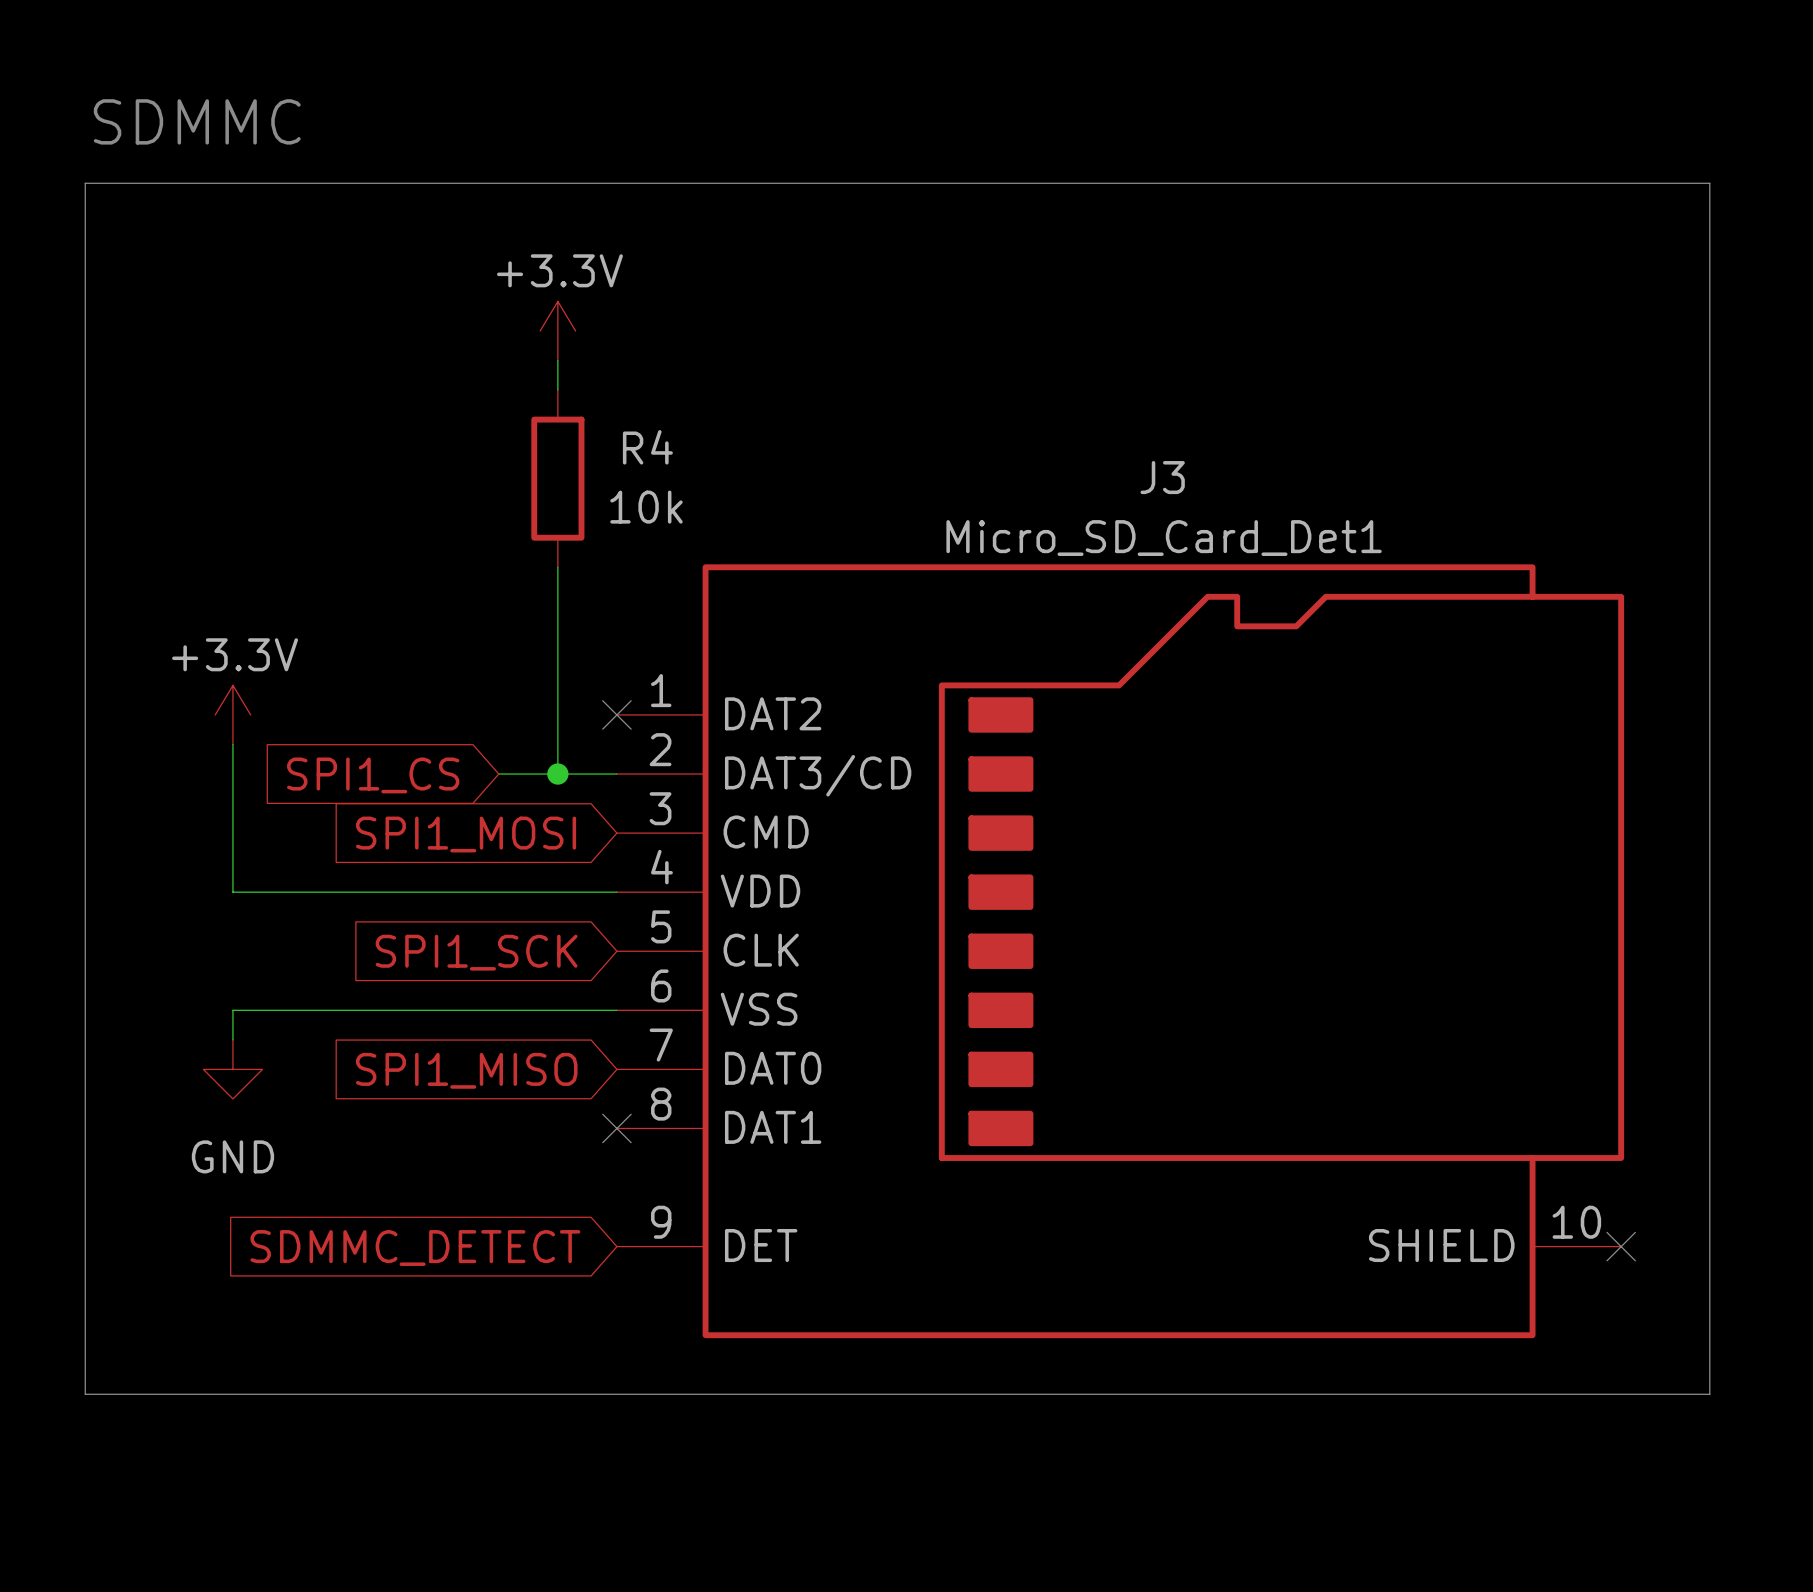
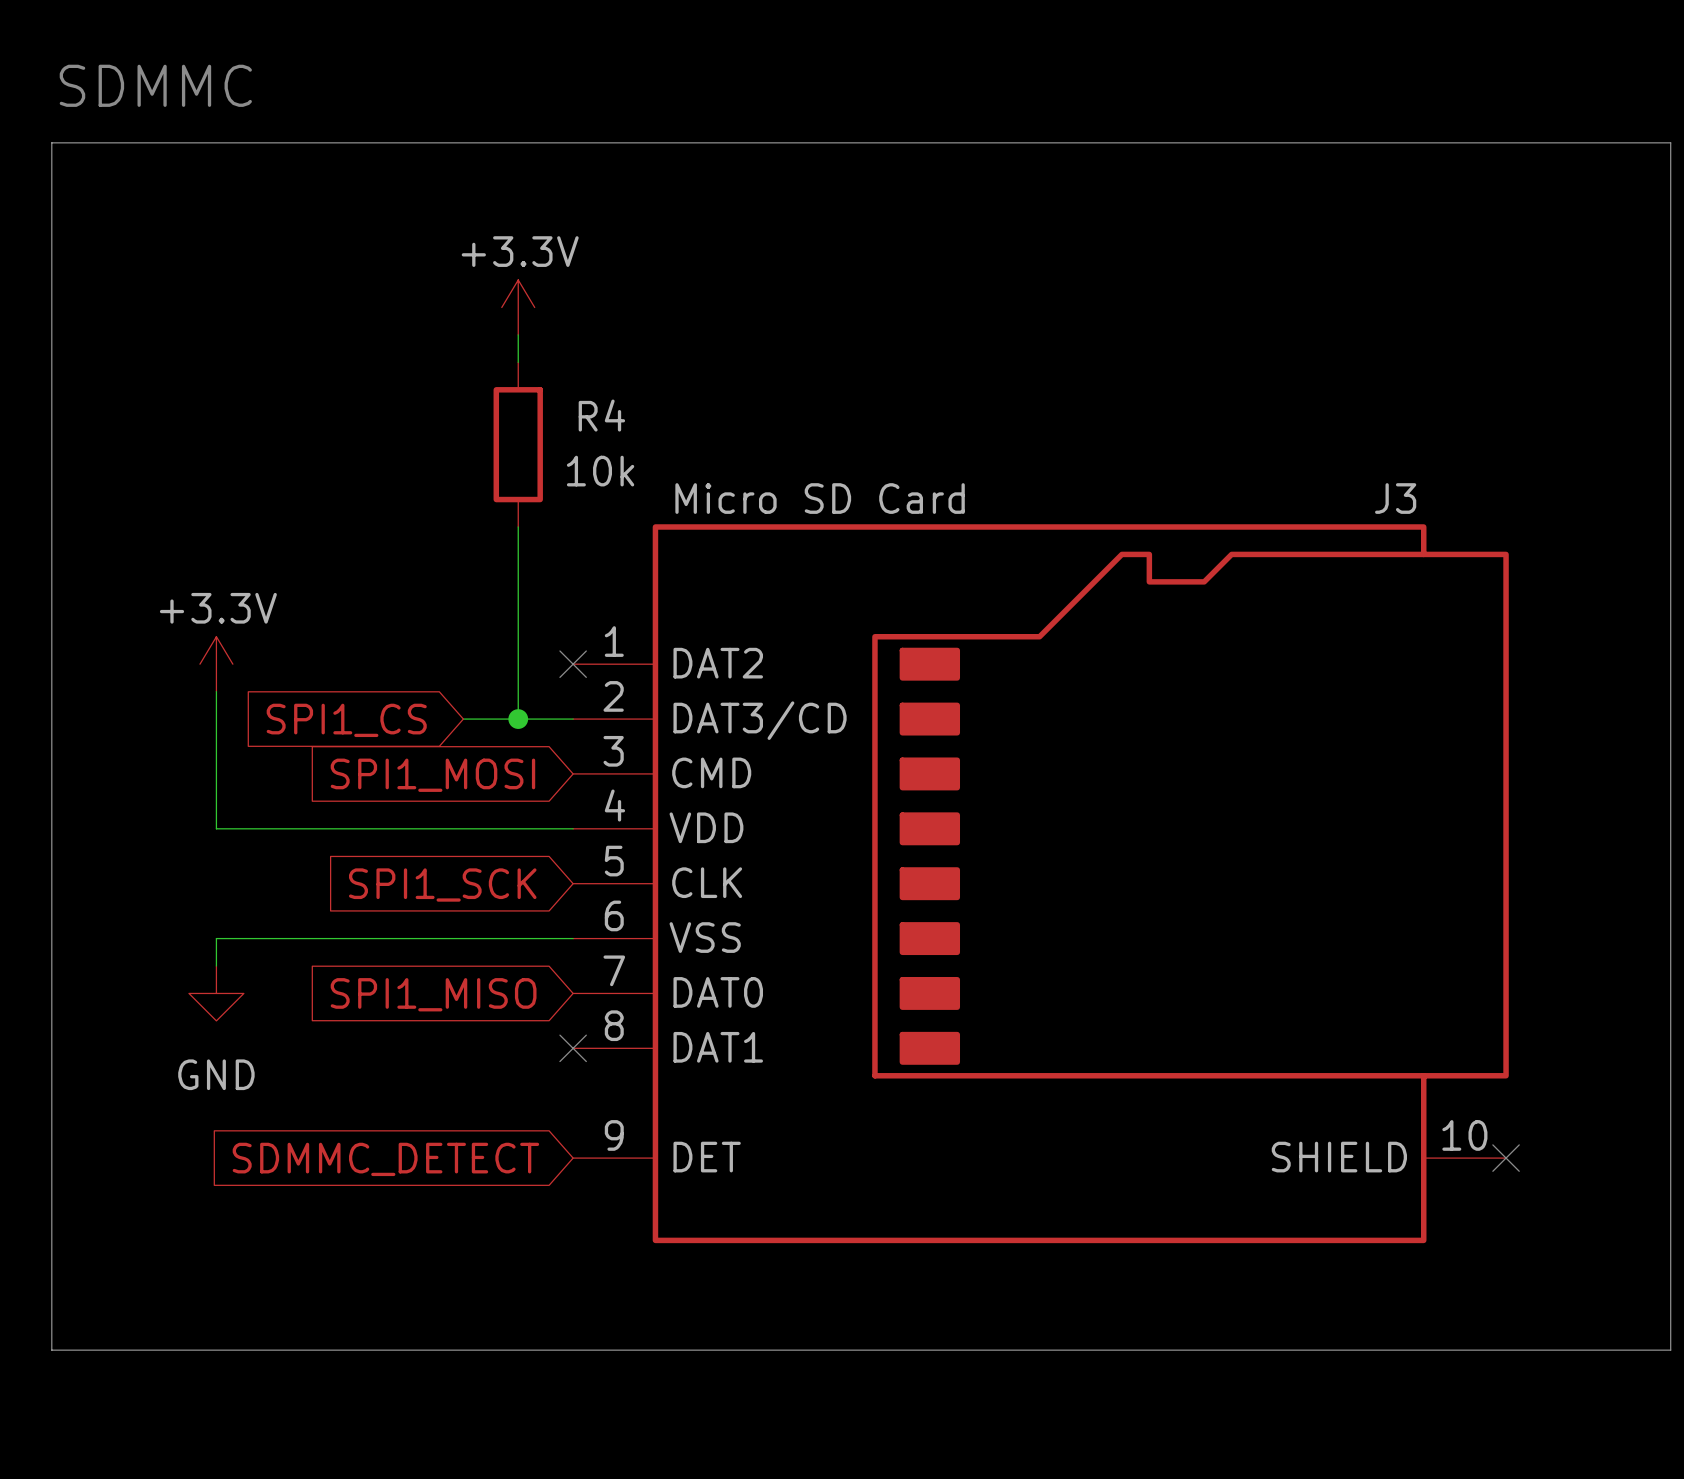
text position: SDMMC (197, 121) -> SDMMC (155, 85)
line: (85, 183) (1709, 183) (1709, 1394) (85, 1394) (85, 183) -> (51, 142) (51, 1350) (1670, 1350) (1670, 142) (51, 142)
J3 name position: J3 (1162, 477) -> J3 (1395, 498)
J3 value: Micro_SD_Card_Det1 (1164, 538) -> Micro SD Card (820, 498)

